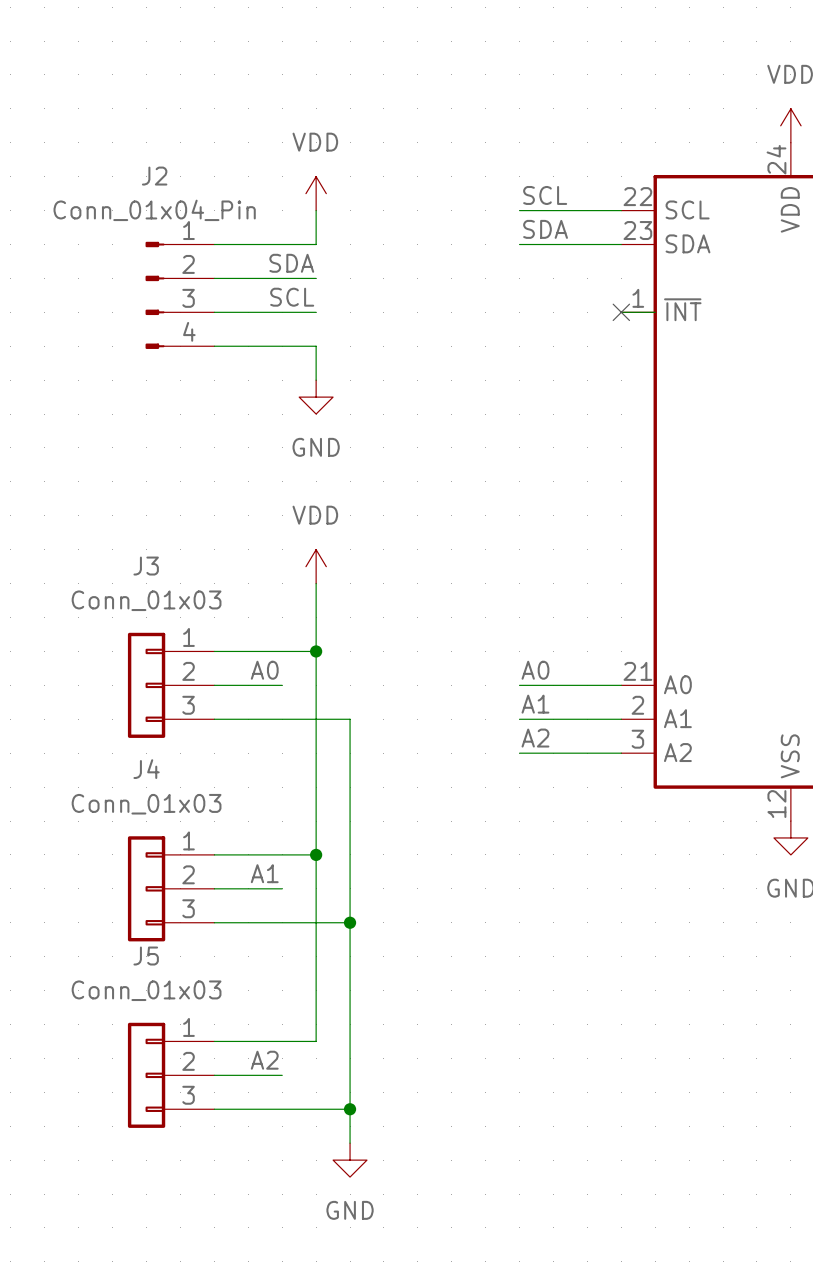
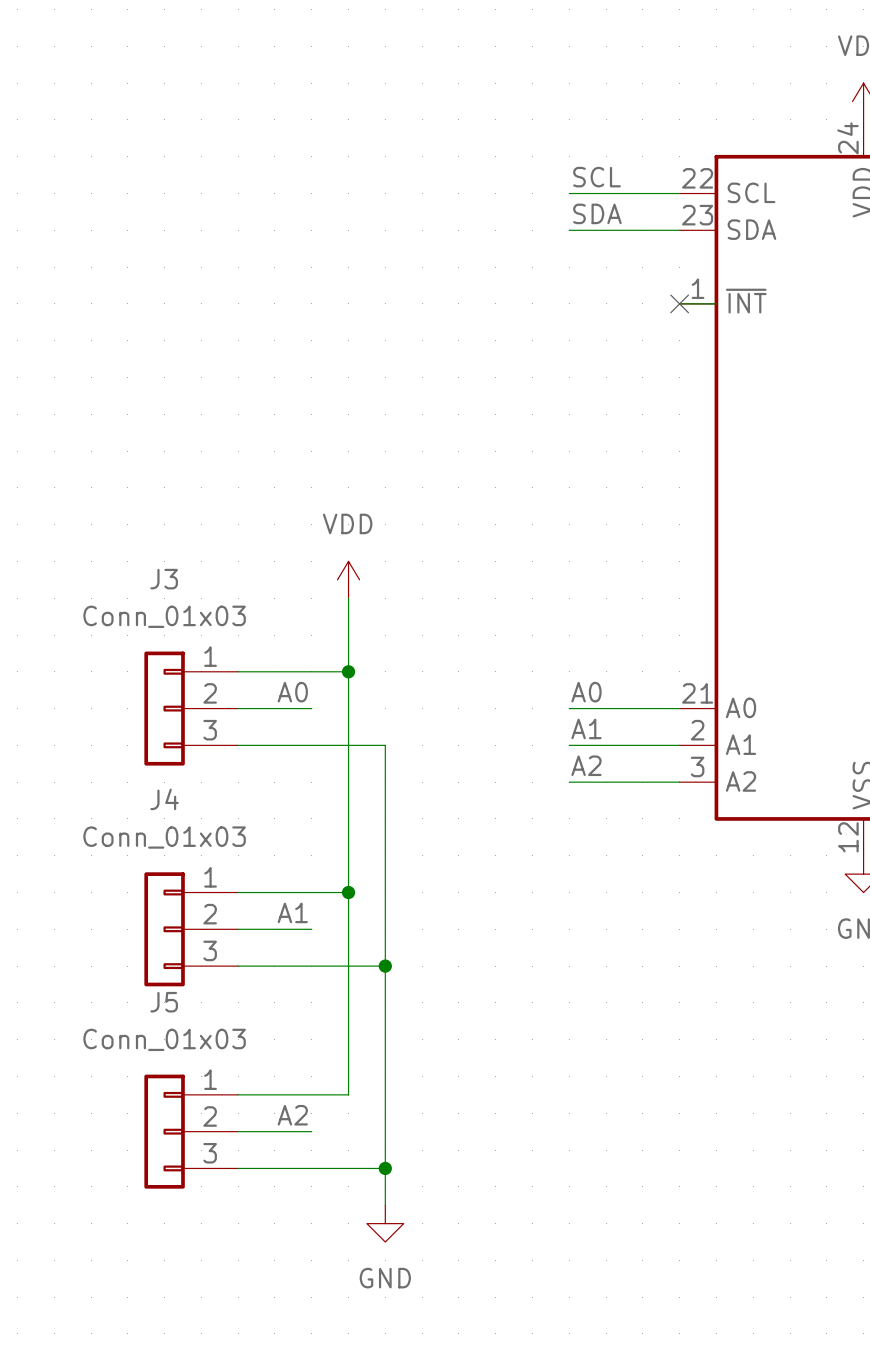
power symbol: VDD (316, 193) -> none
wire: (316, 210) (316, 244) (214, 244) -> none
label: SDA (291, 263) -> none
wire: (214, 278) (316, 278) -> none
J2: Conn_01x04_Pin (179, 295) -> none
label: SCL (292, 297) -> none
wire: (214, 312) (316, 312) -> none
wire: (214, 346) (316, 346) (316, 380) -> none
power symbol: GND (316, 397) -> none

